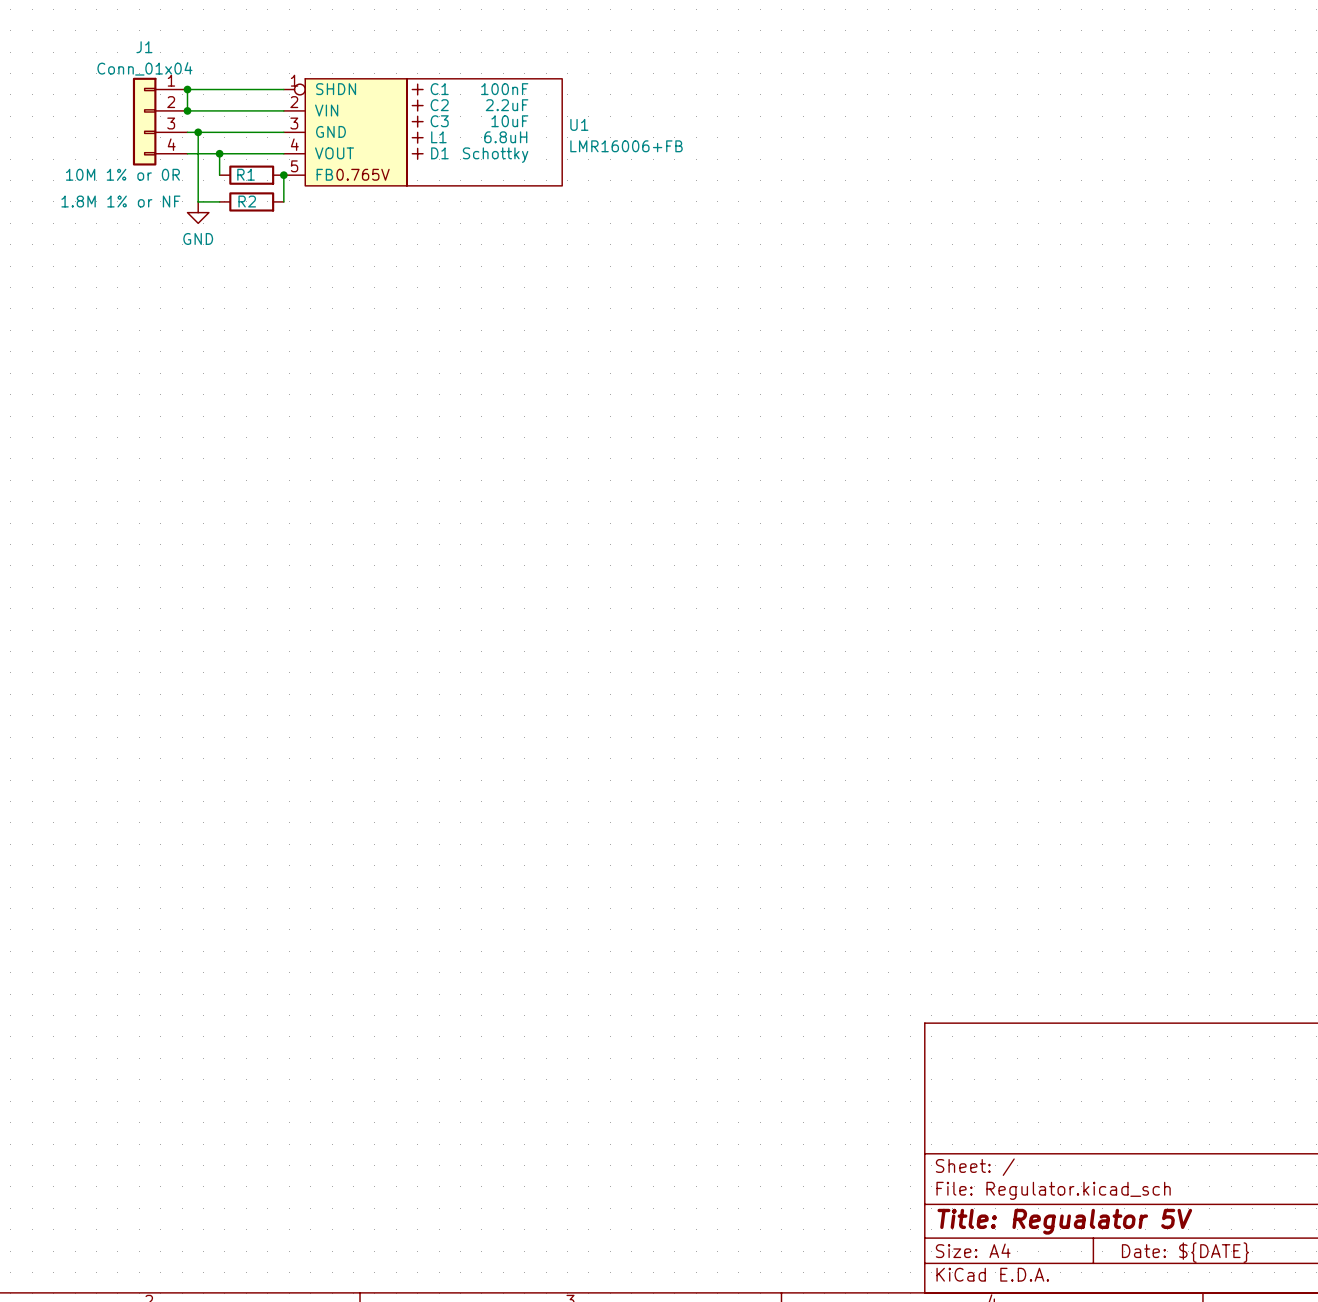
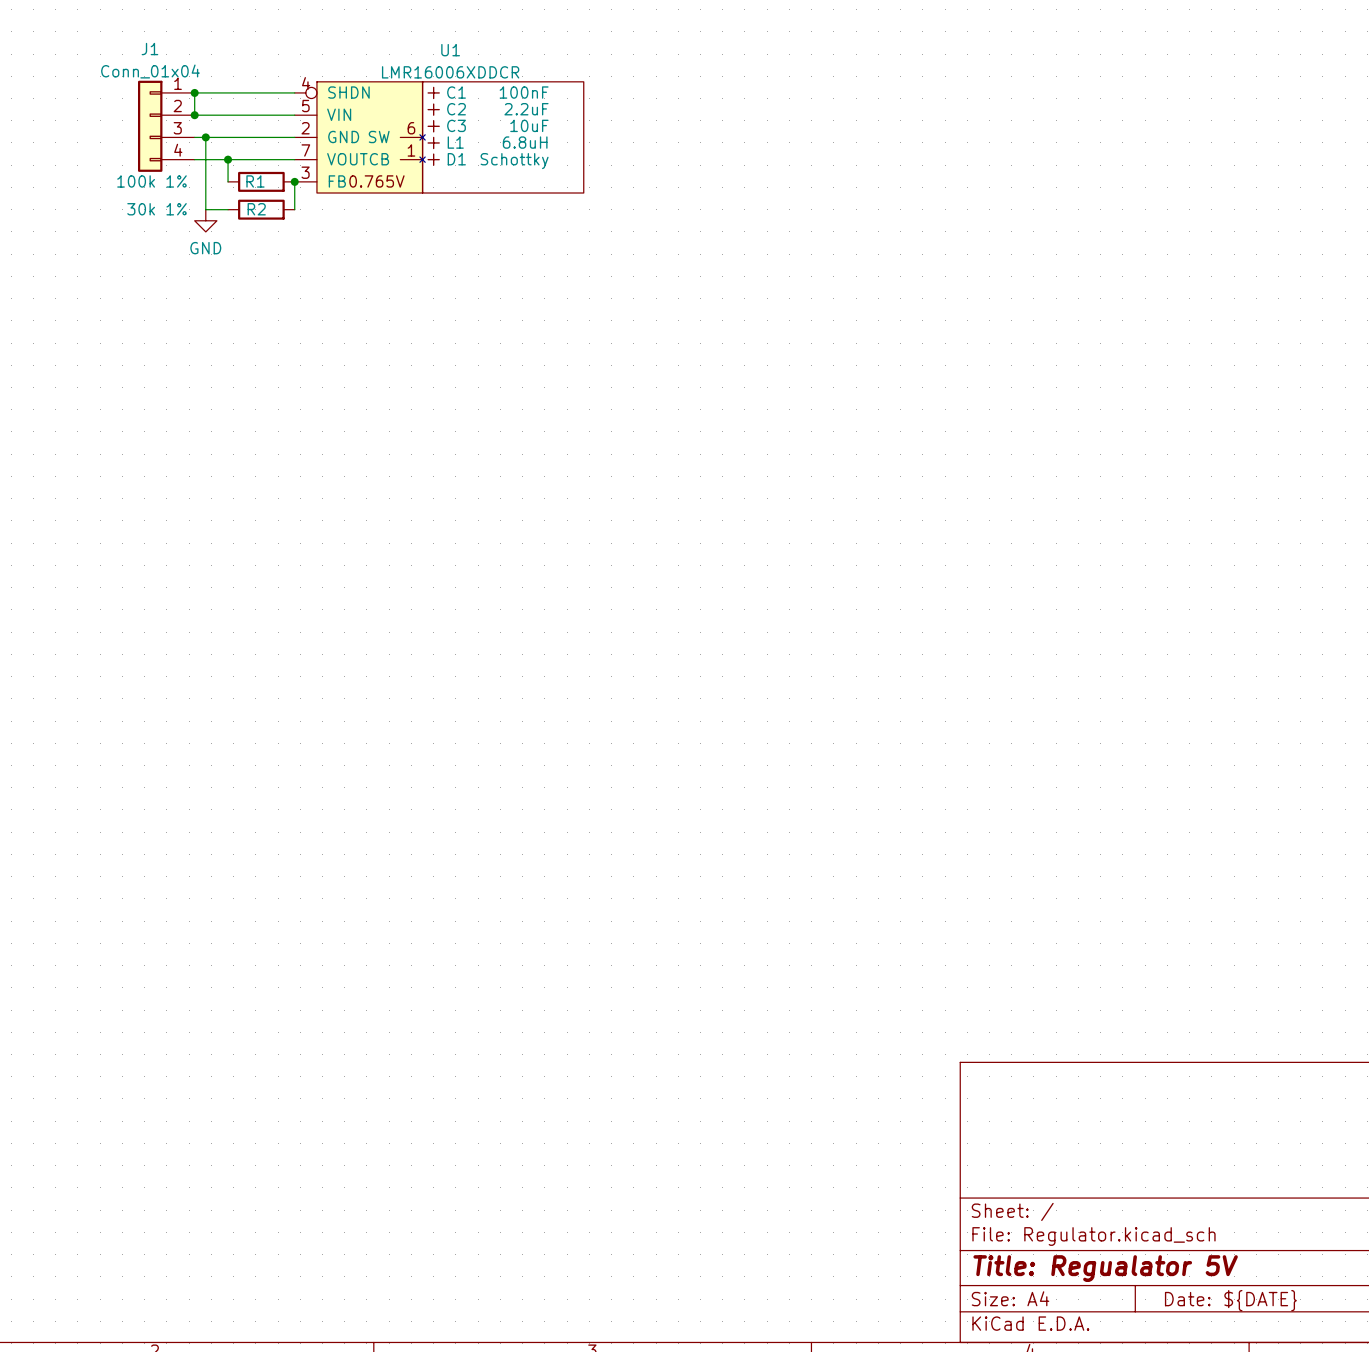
U1 symbol: [283, 78, 563, 186] -> [294, 81, 584, 194]
U1 name position: U1 (579, 124) -> U1 (450, 50)
U1 value: LMR16006+FB (626, 146) -> LMR16006XDDCR (450, 72)
R1 value: 10M 1% or 0R (122, 174) -> 100k 1% (151, 181)
R2 value: 1.8M 1% or NF (120, 201) -> 30k 1% (157, 209)

